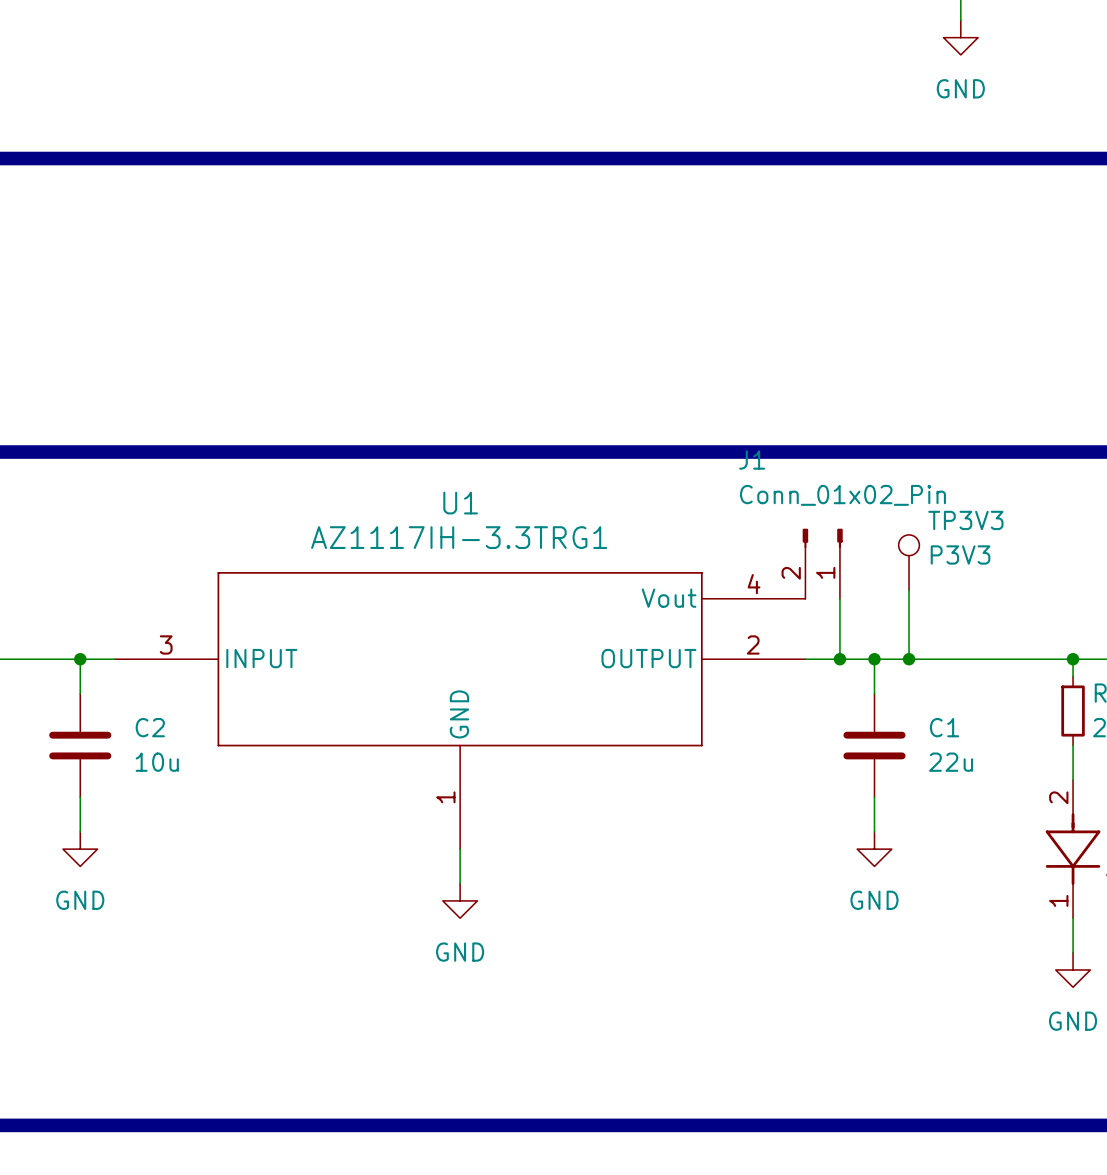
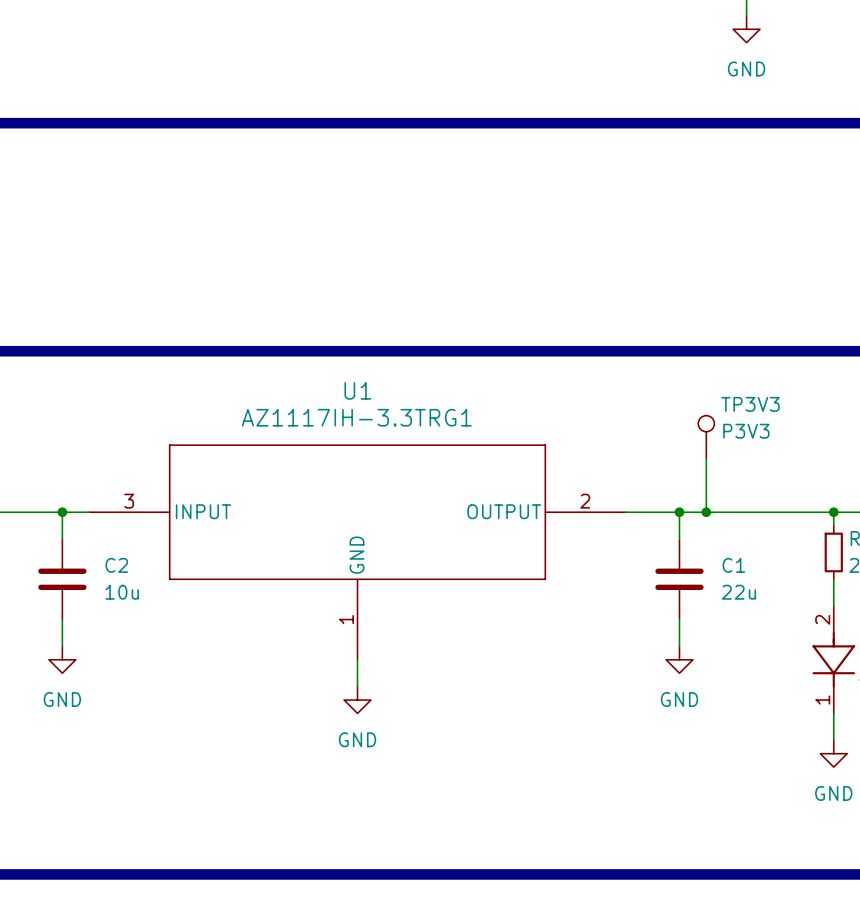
J1: Conn_01x02_Pin (822, 563) -> none
U1 symbol: [114, 572, 806, 850] -> [89, 444, 626, 660]
wire: (839, 598) (839, 659) -> none
junction: (839, 659) -> none

